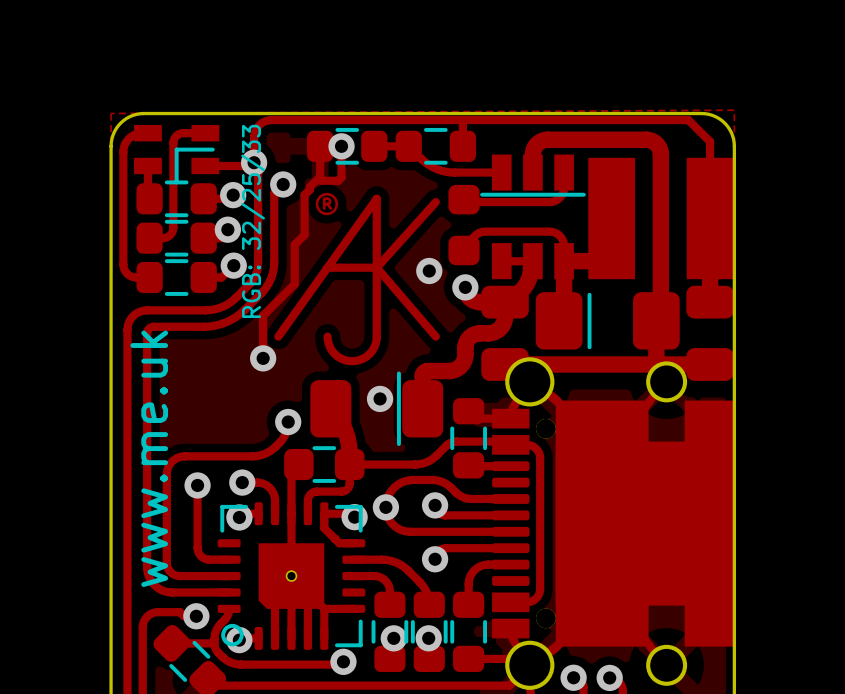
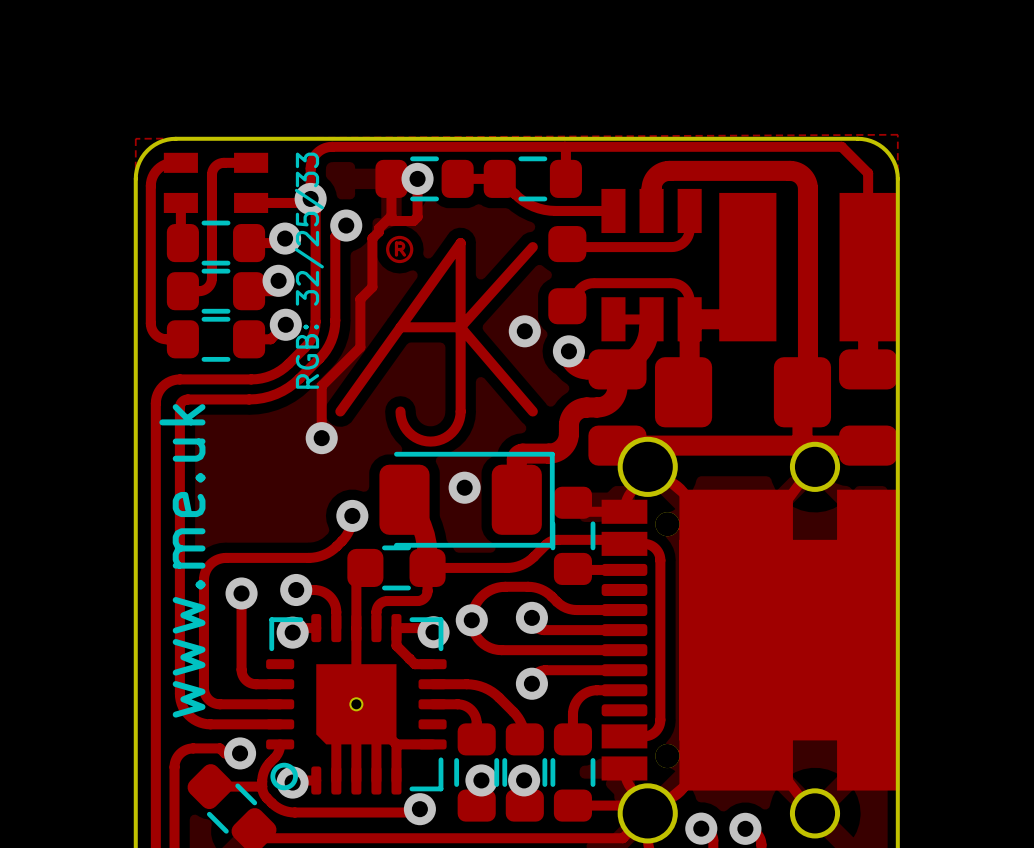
part footprint: [134, 125, 220, 185] -> [163, 152, 269, 213]
part footprint: [448, 131, 734, 381] -> [548, 160, 898, 466]
part footprint: [310, 371, 444, 447] -> [379, 451, 555, 548]

